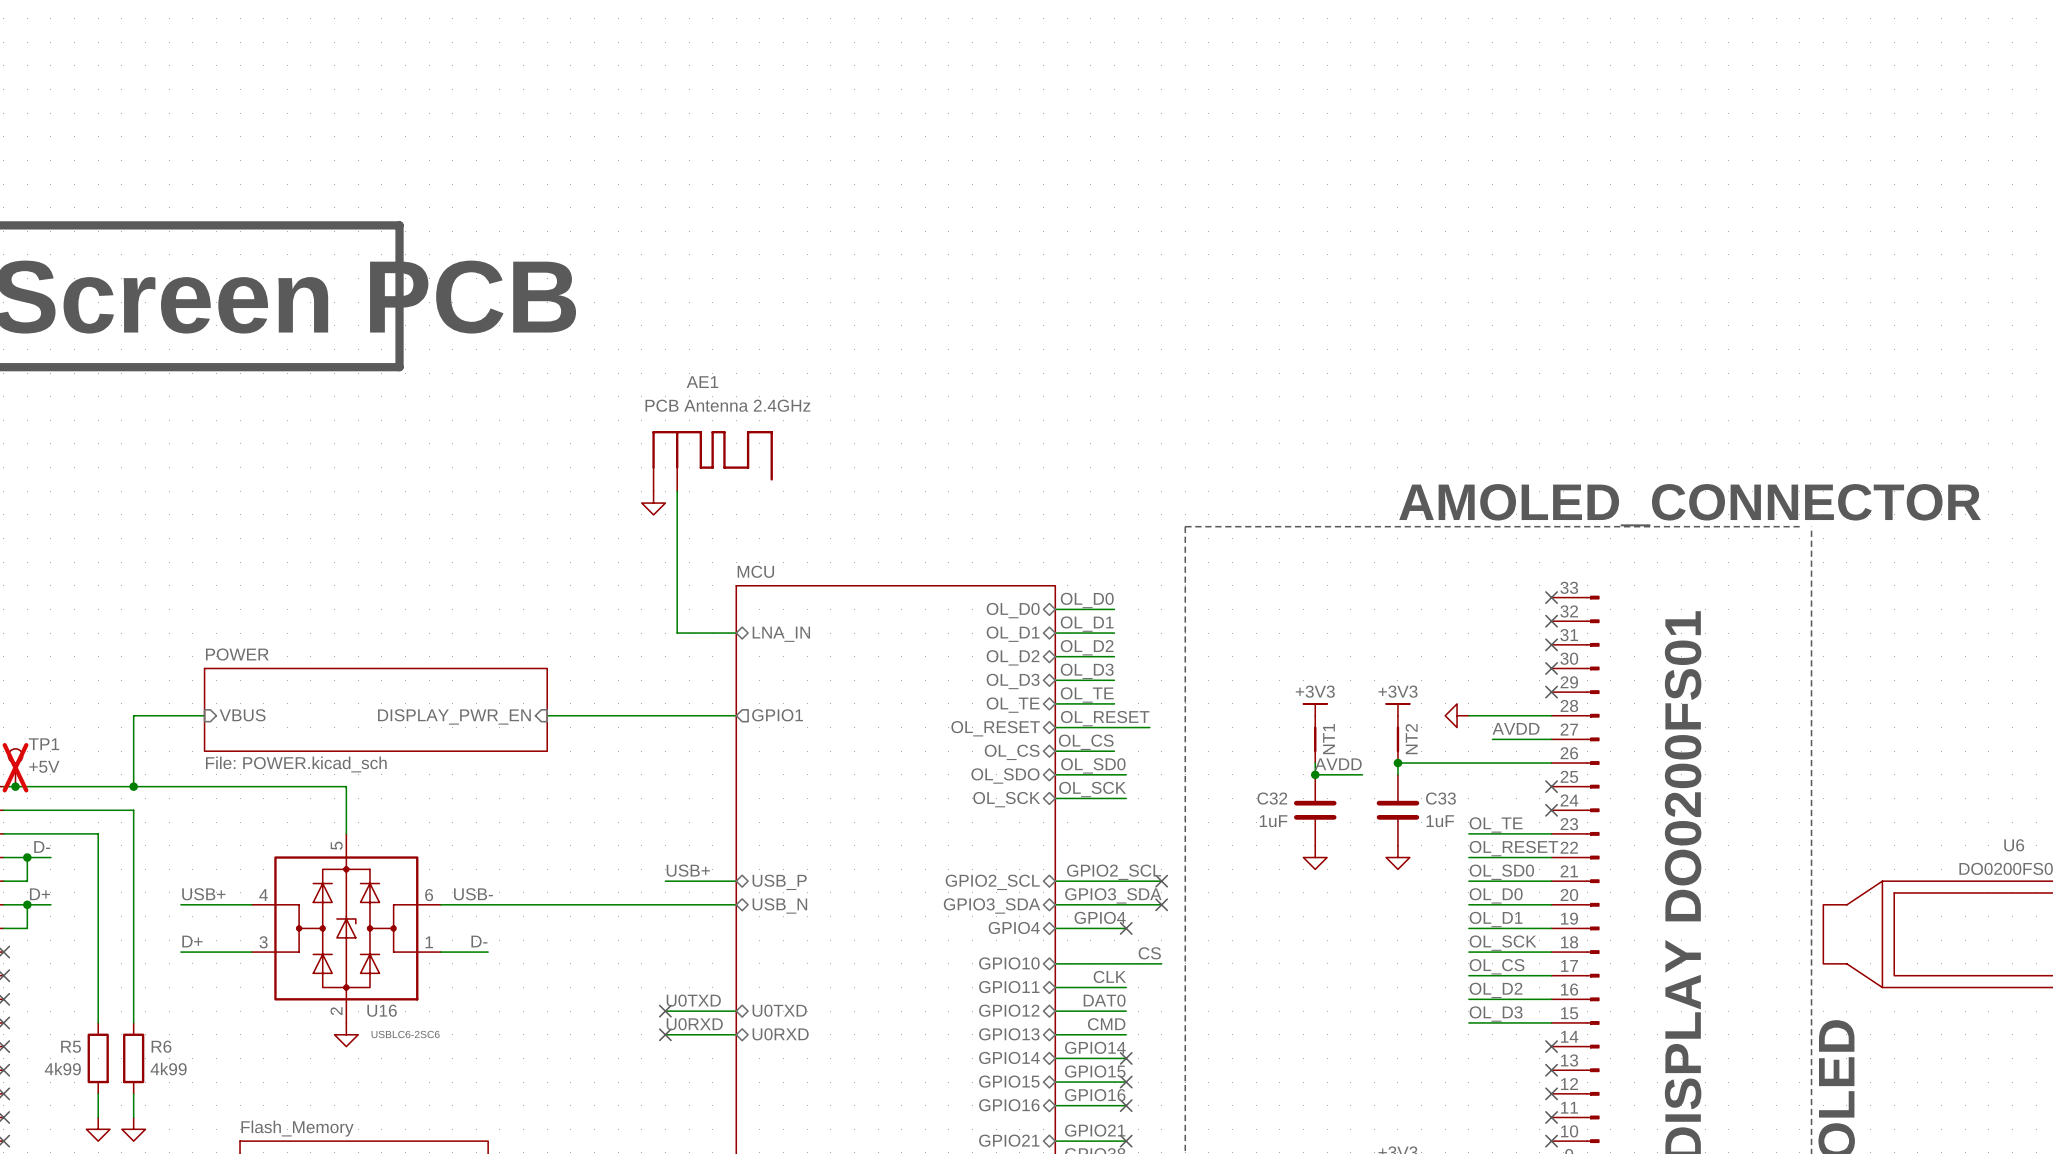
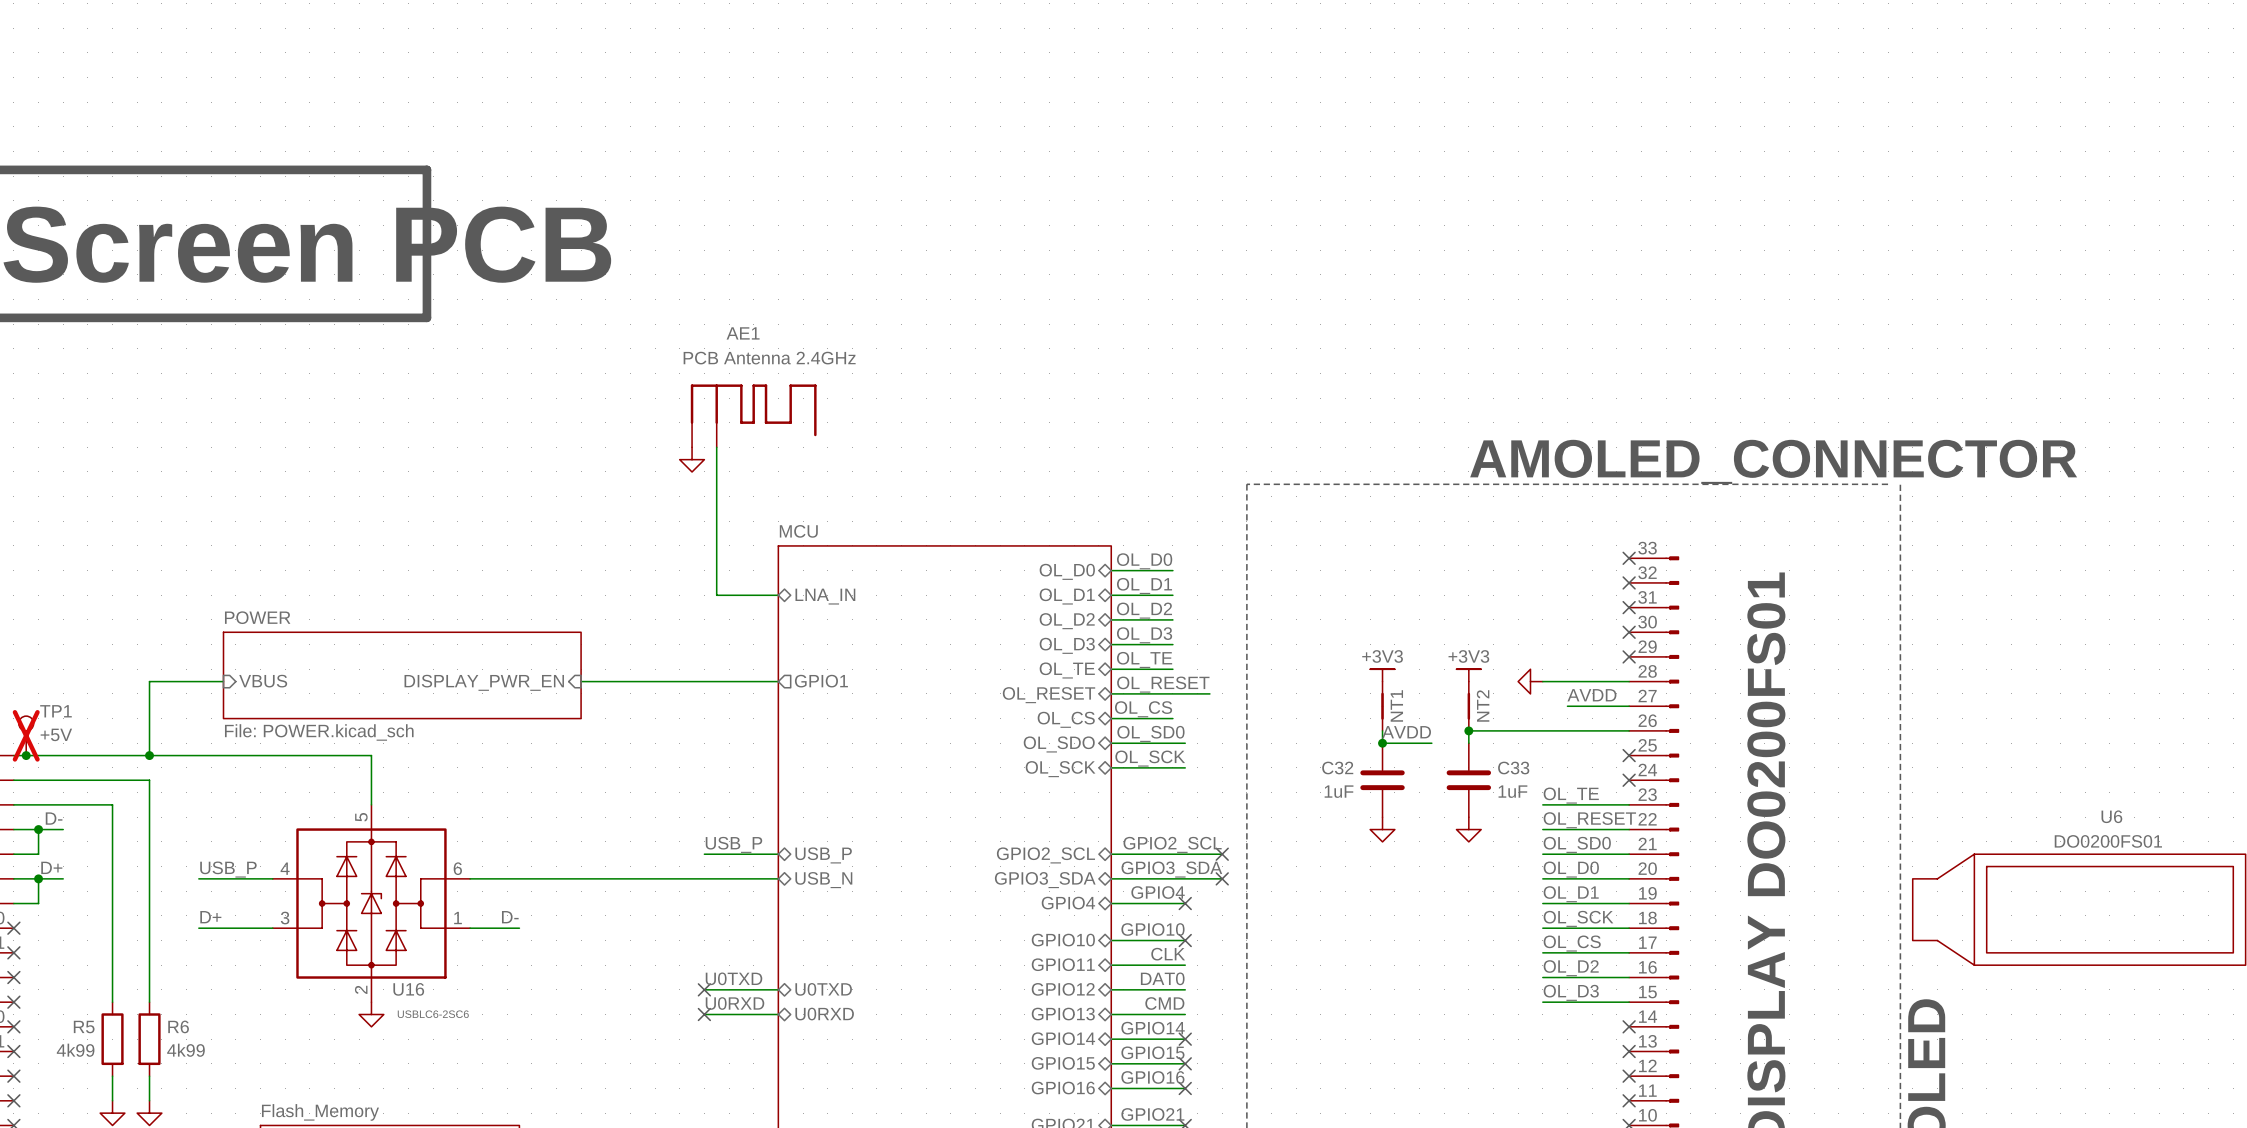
label: USB+ (688, 870) -> USB_P (733, 844)
label: USB+ (203, 894) -> USB_P (228, 869)
label: USB- (473, 894) -> none
label: none -> GPIO10 (1152, 929)
label: CS (1149, 953) -> none
wire: (1126, 963) (1161, 963) -> none
no-connect mark: none -> (1185, 940)

